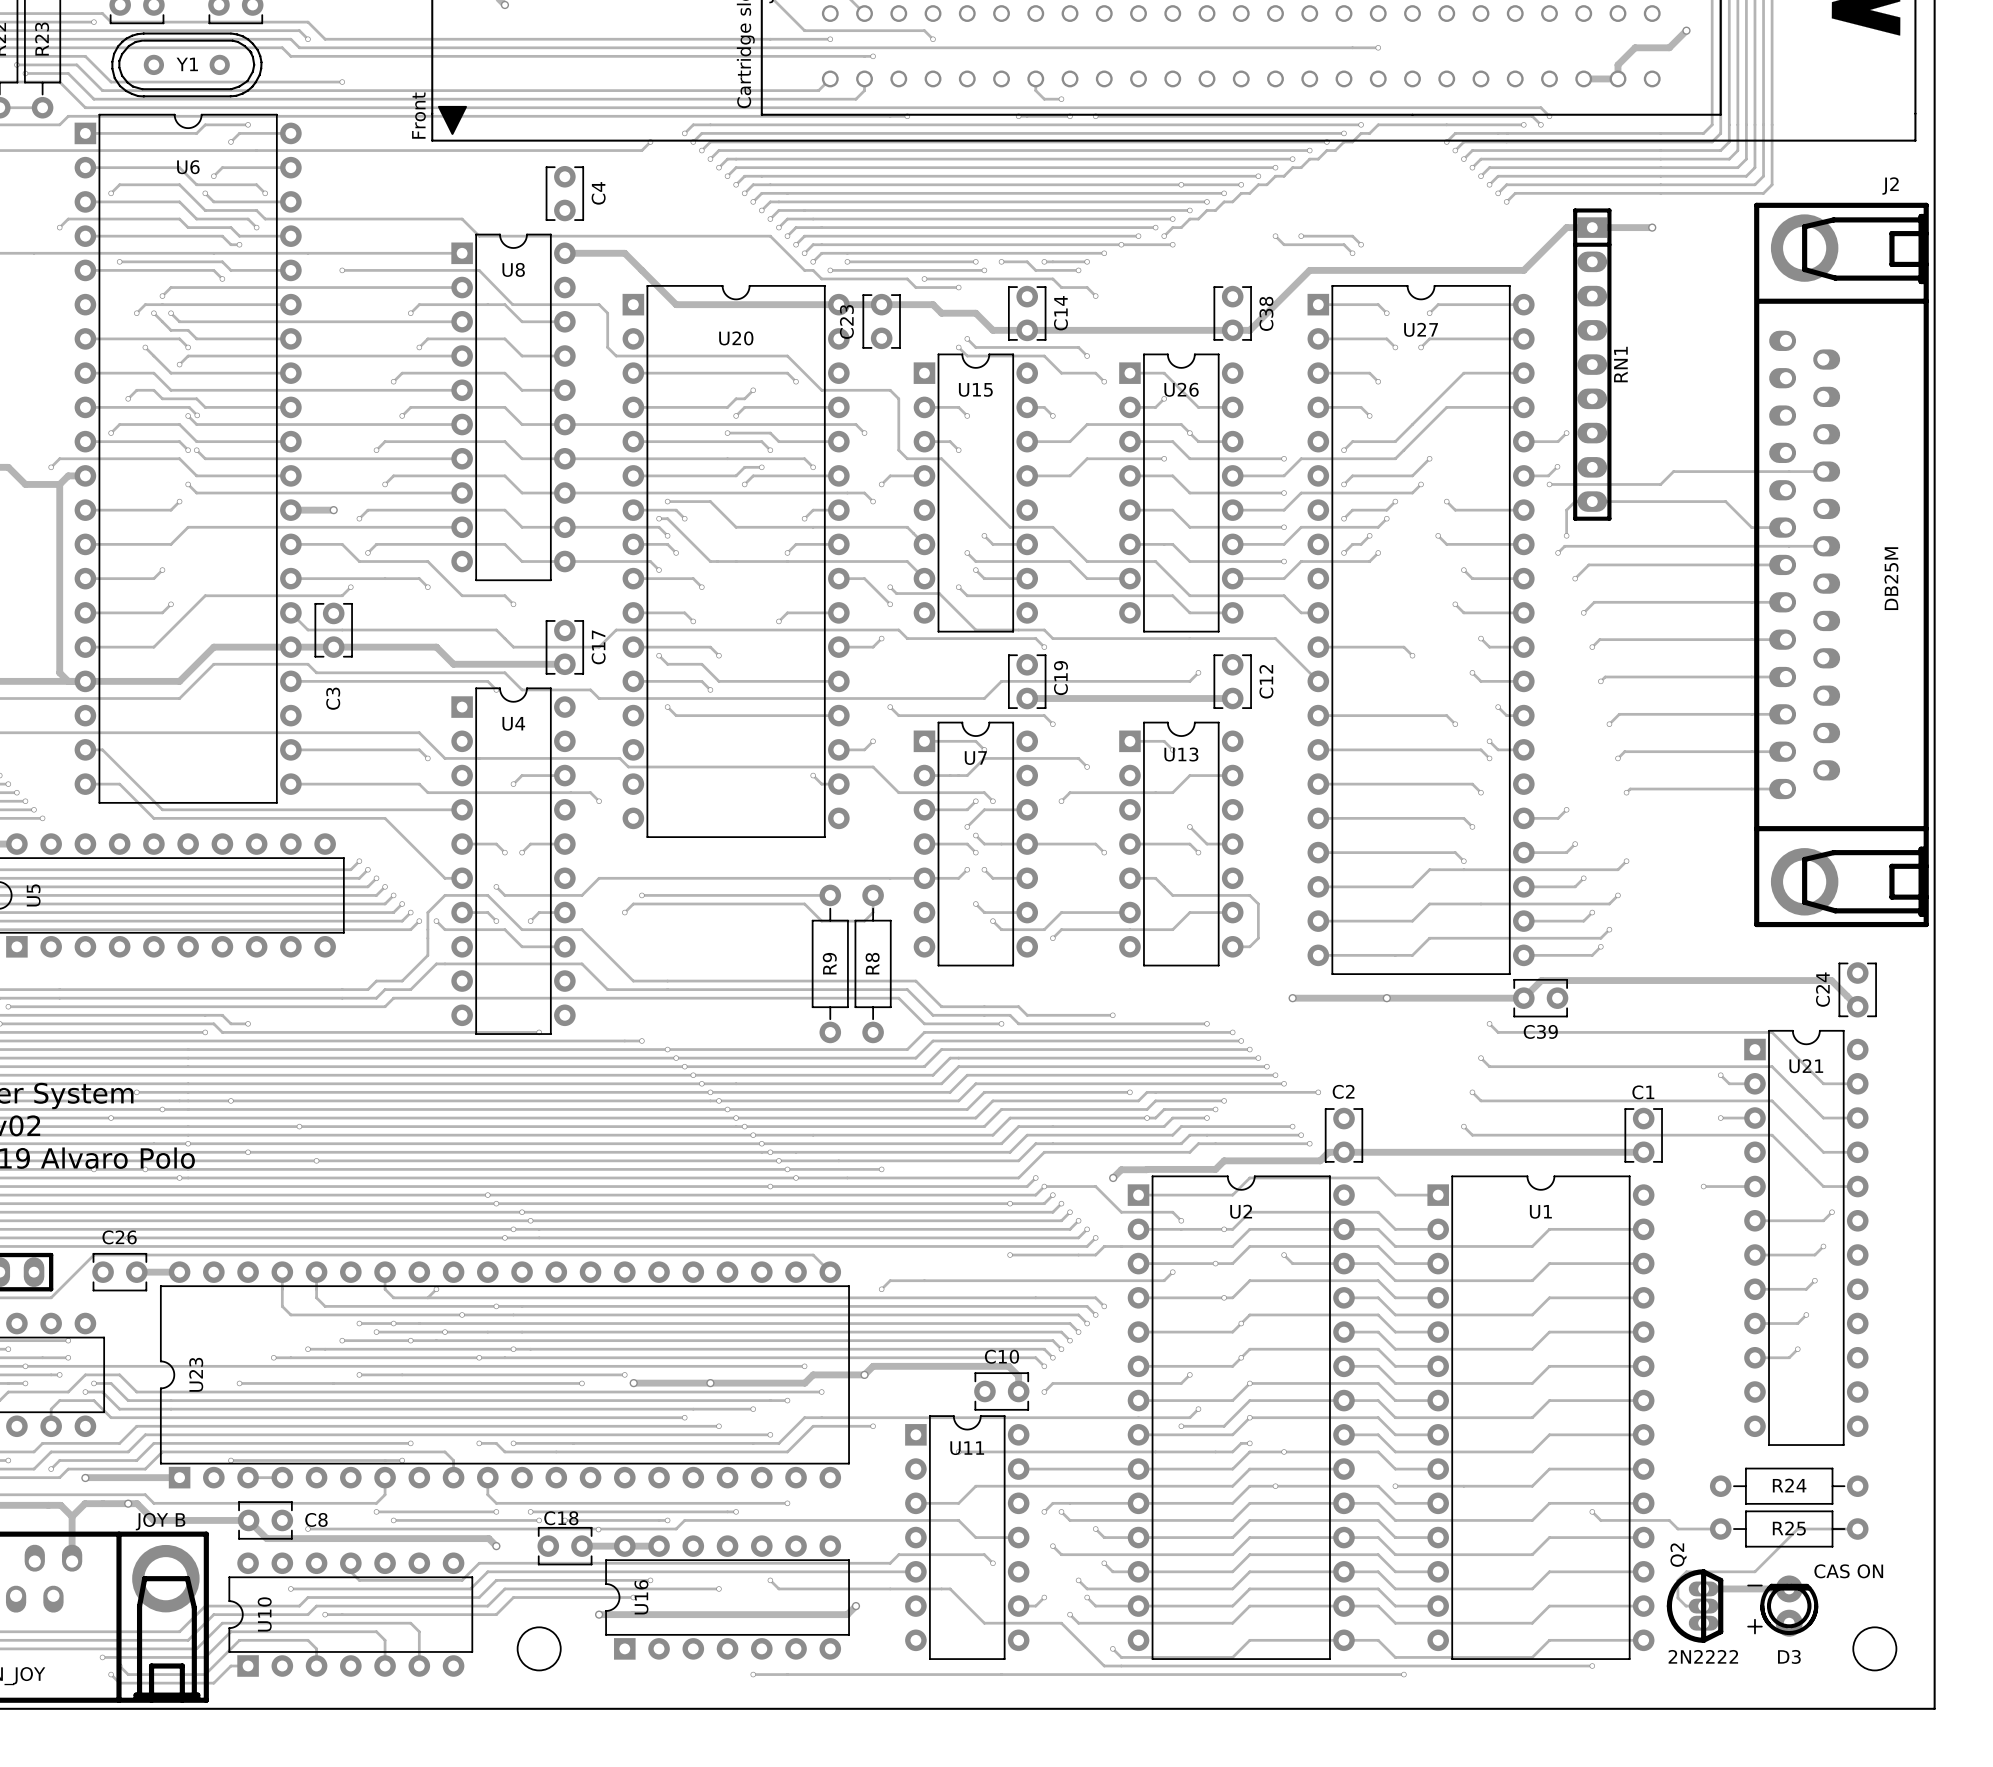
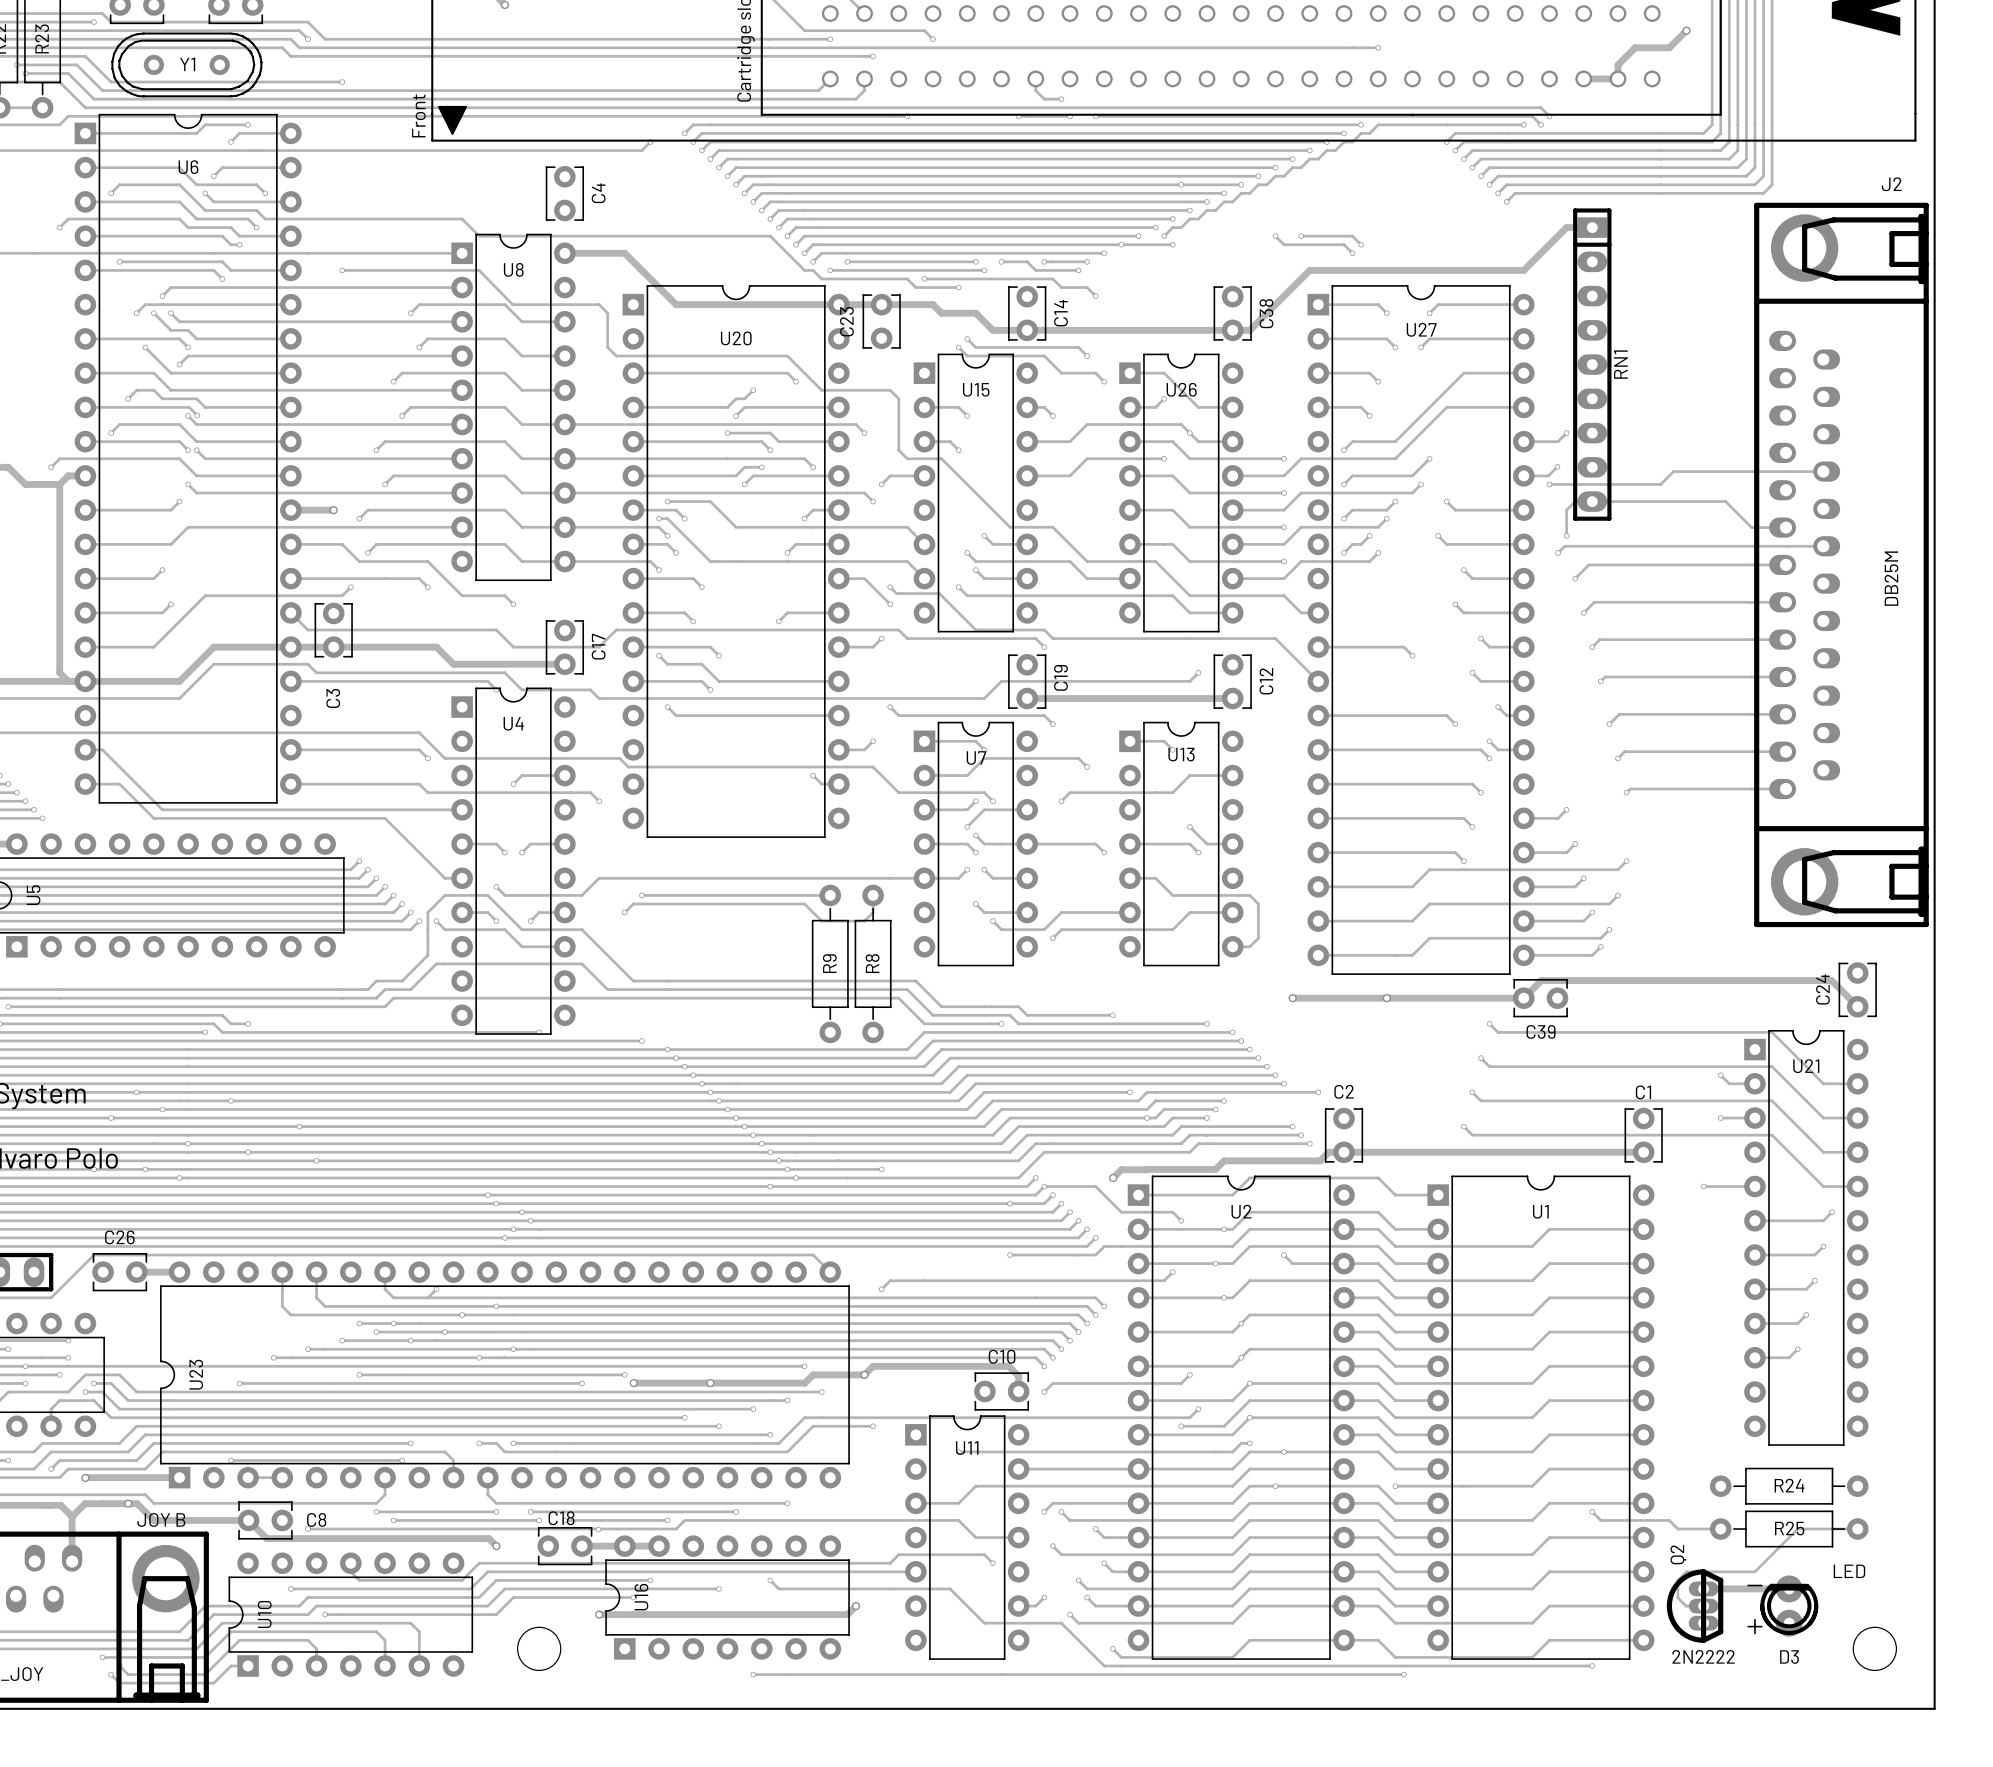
track: (1592, 227) (1652, 227) -> none
via: (1652, 227) -> none
D3 value: CAS ON (1848, 1571) -> LED (1849, 1571)

